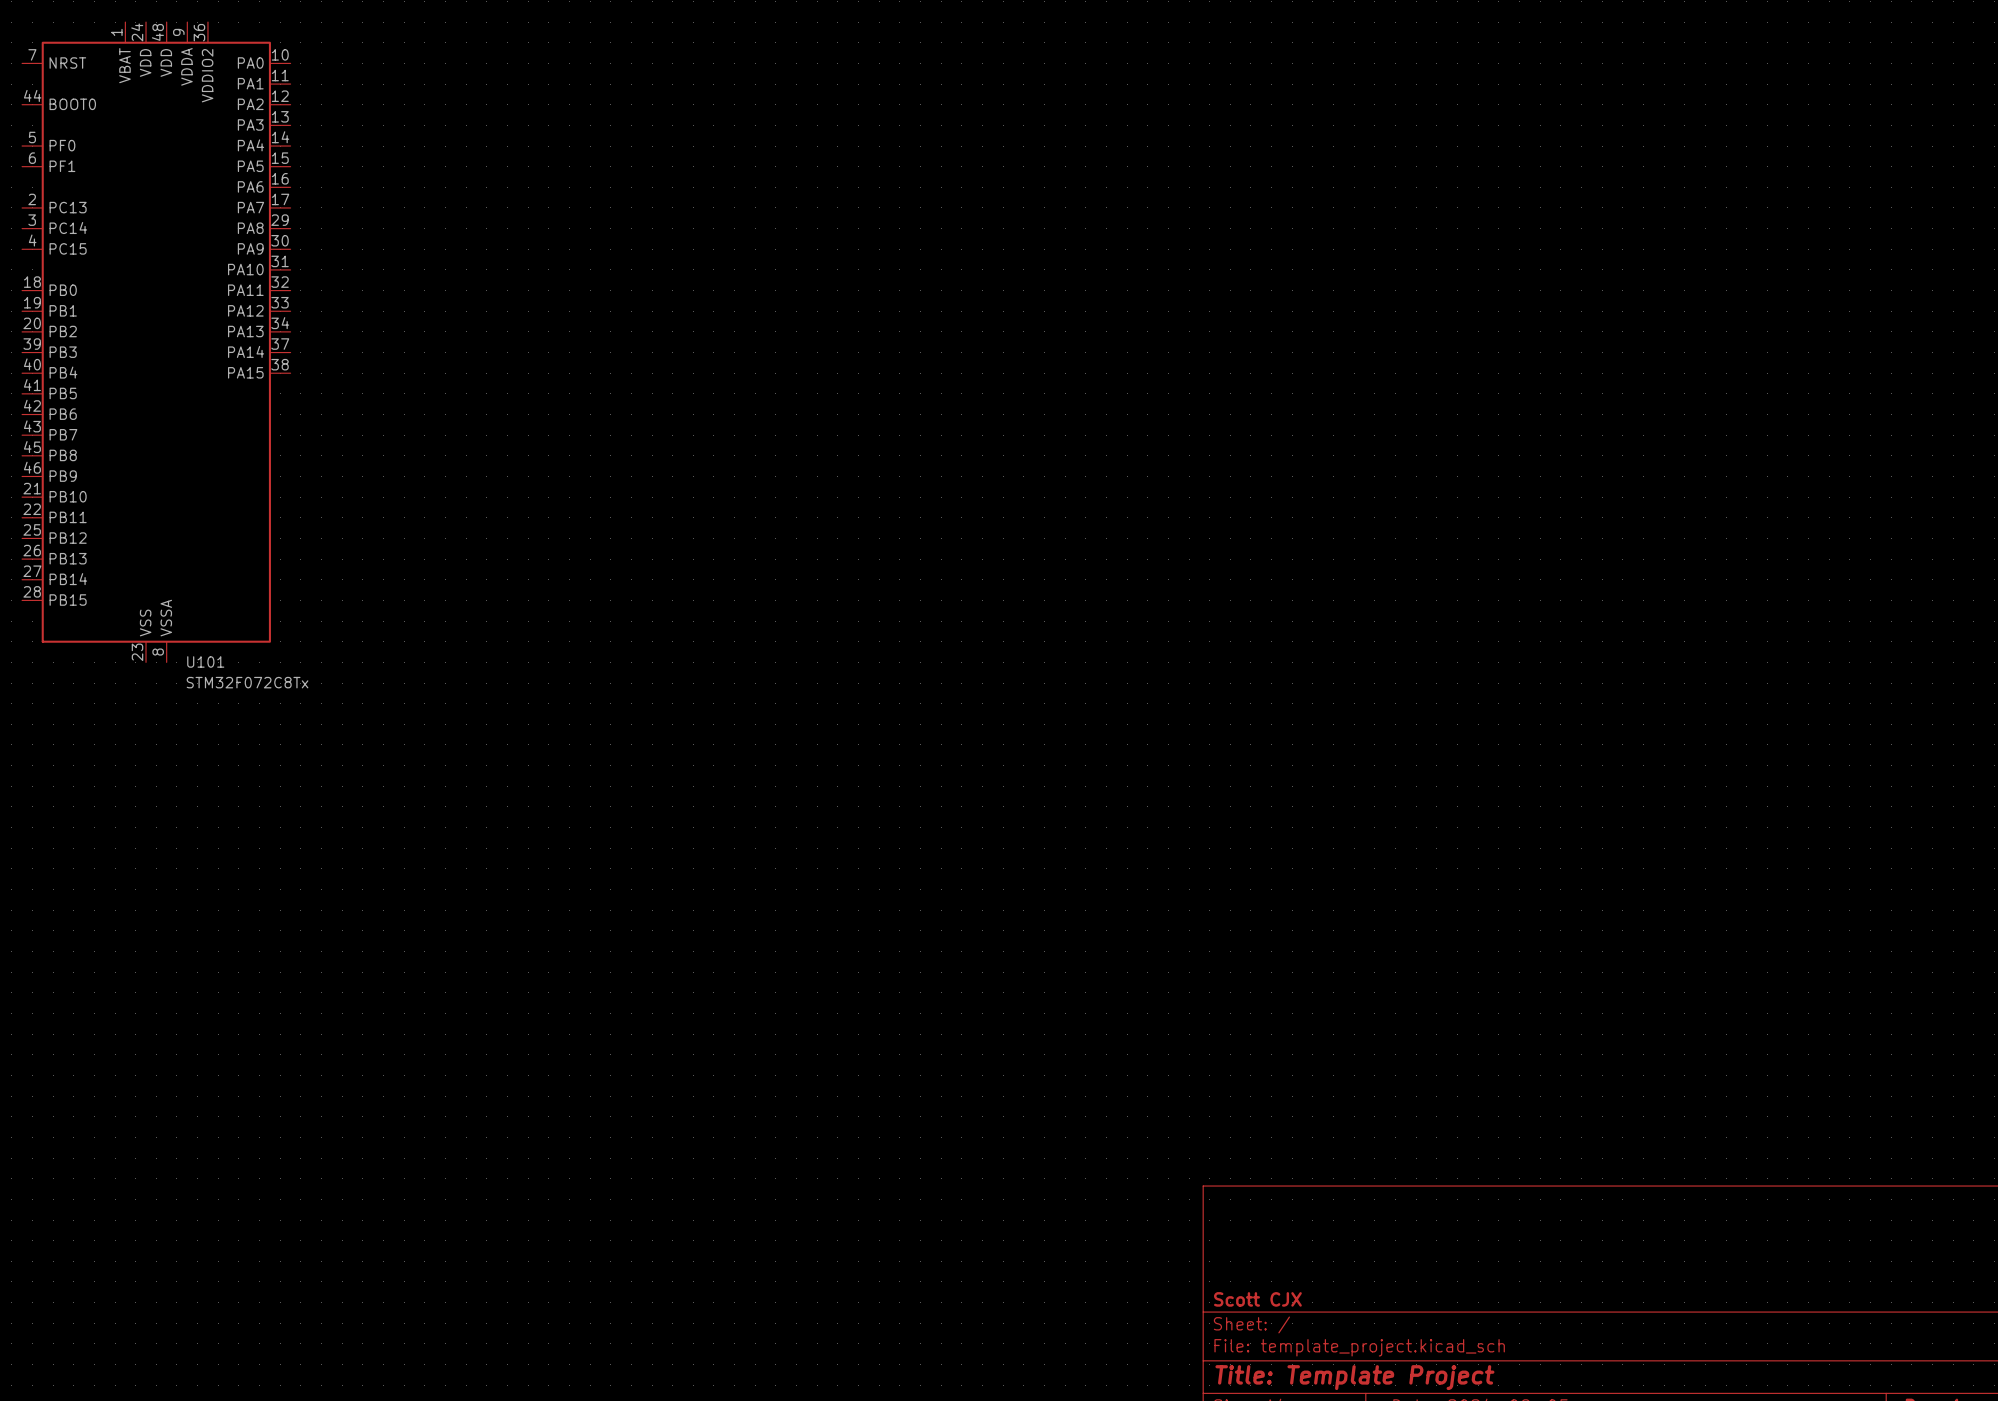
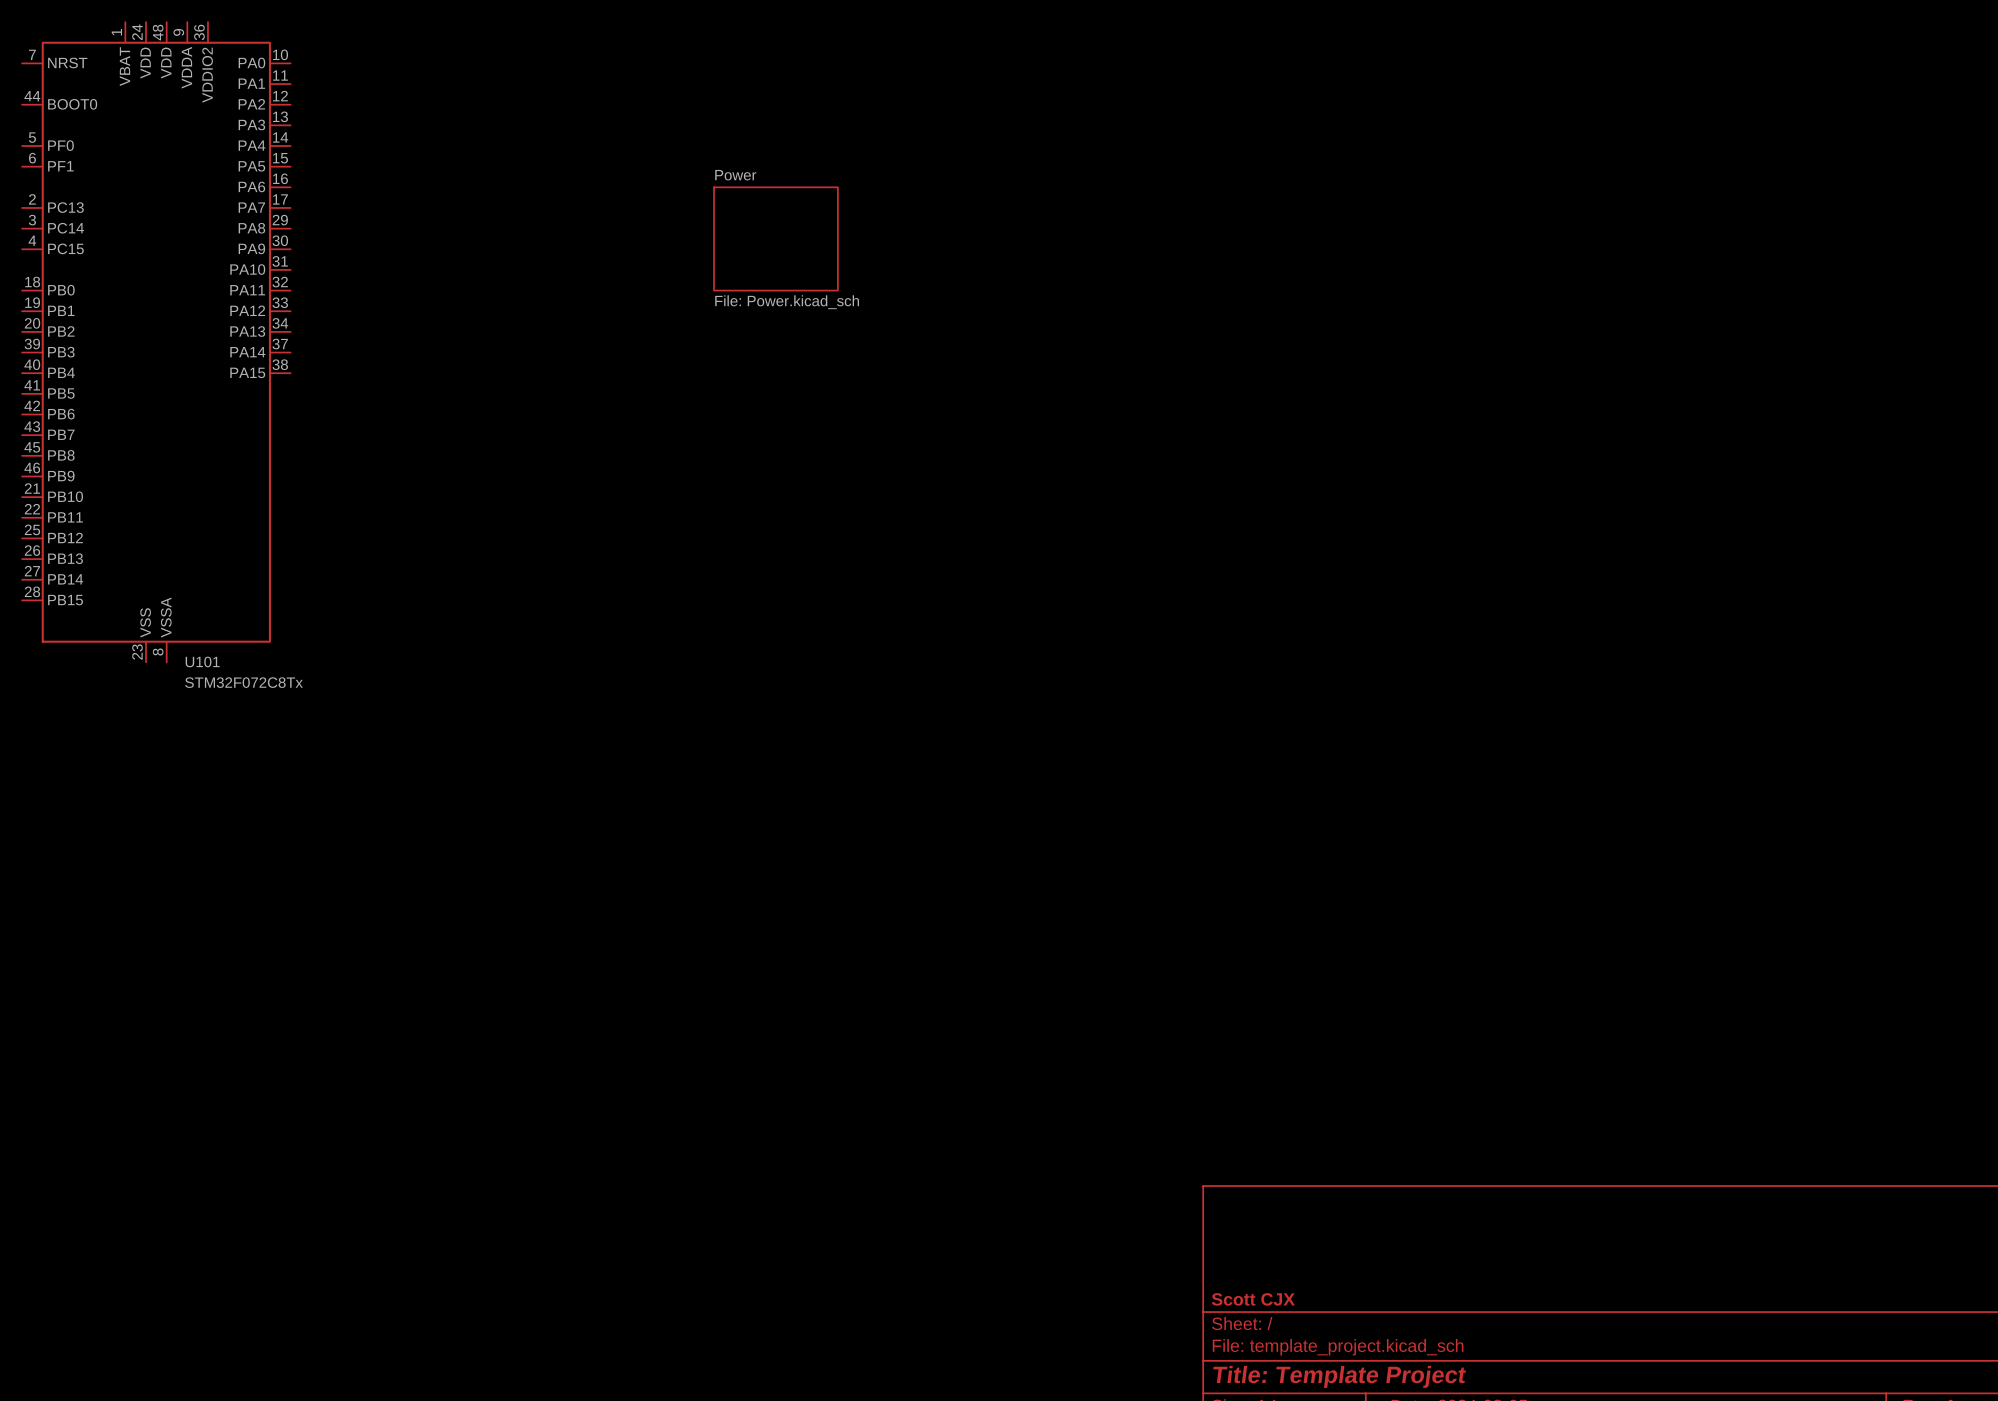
sheet Power: none -> File: Power.kicad_sch (775, 238)

